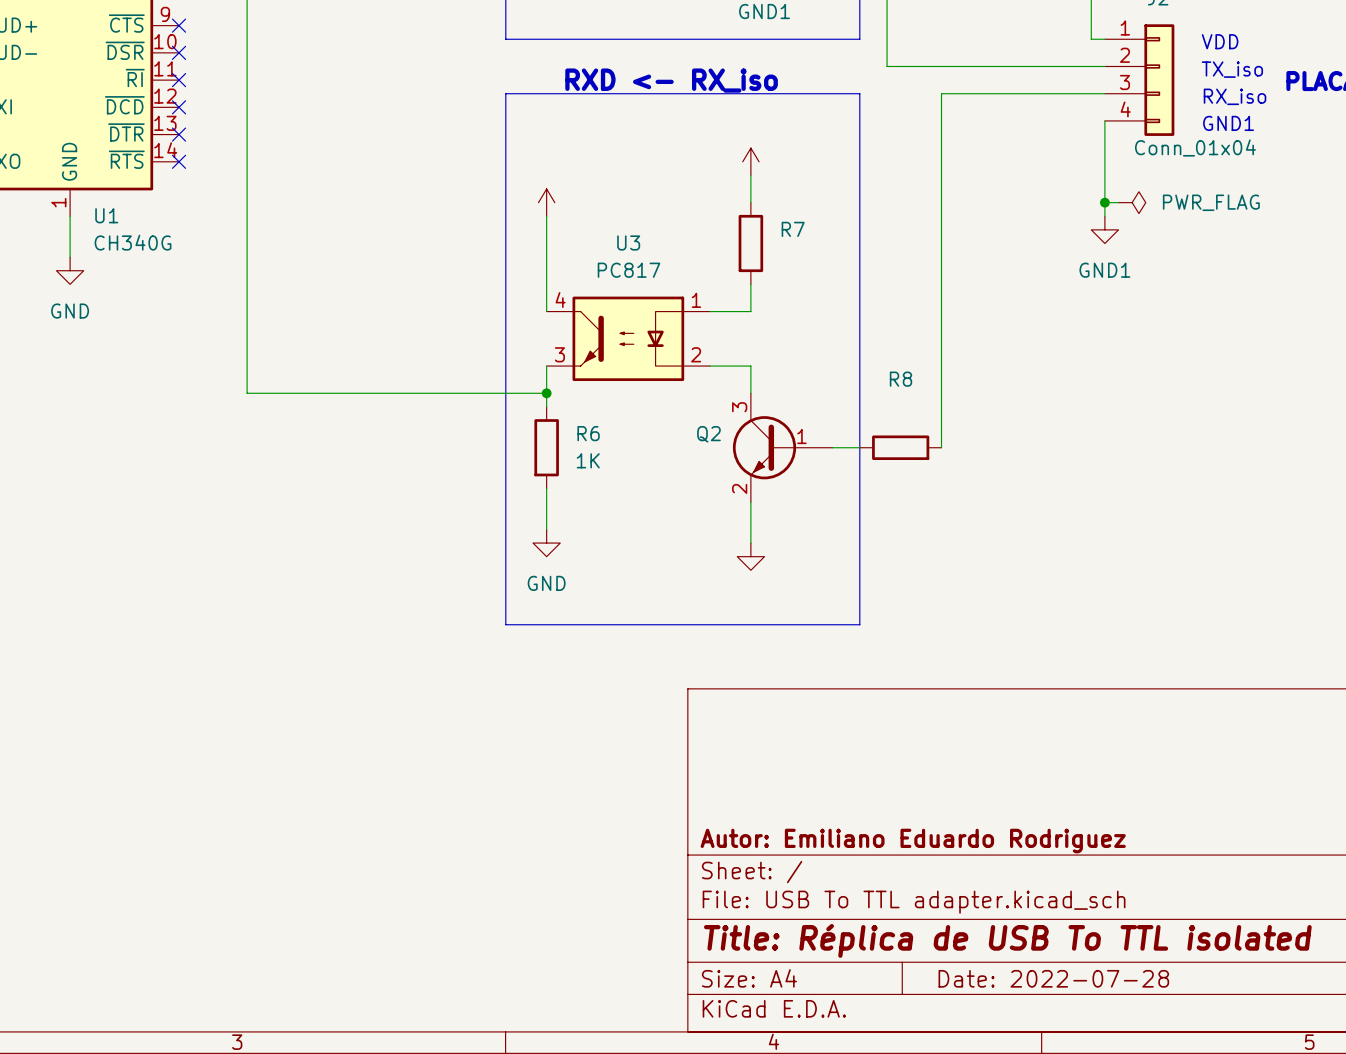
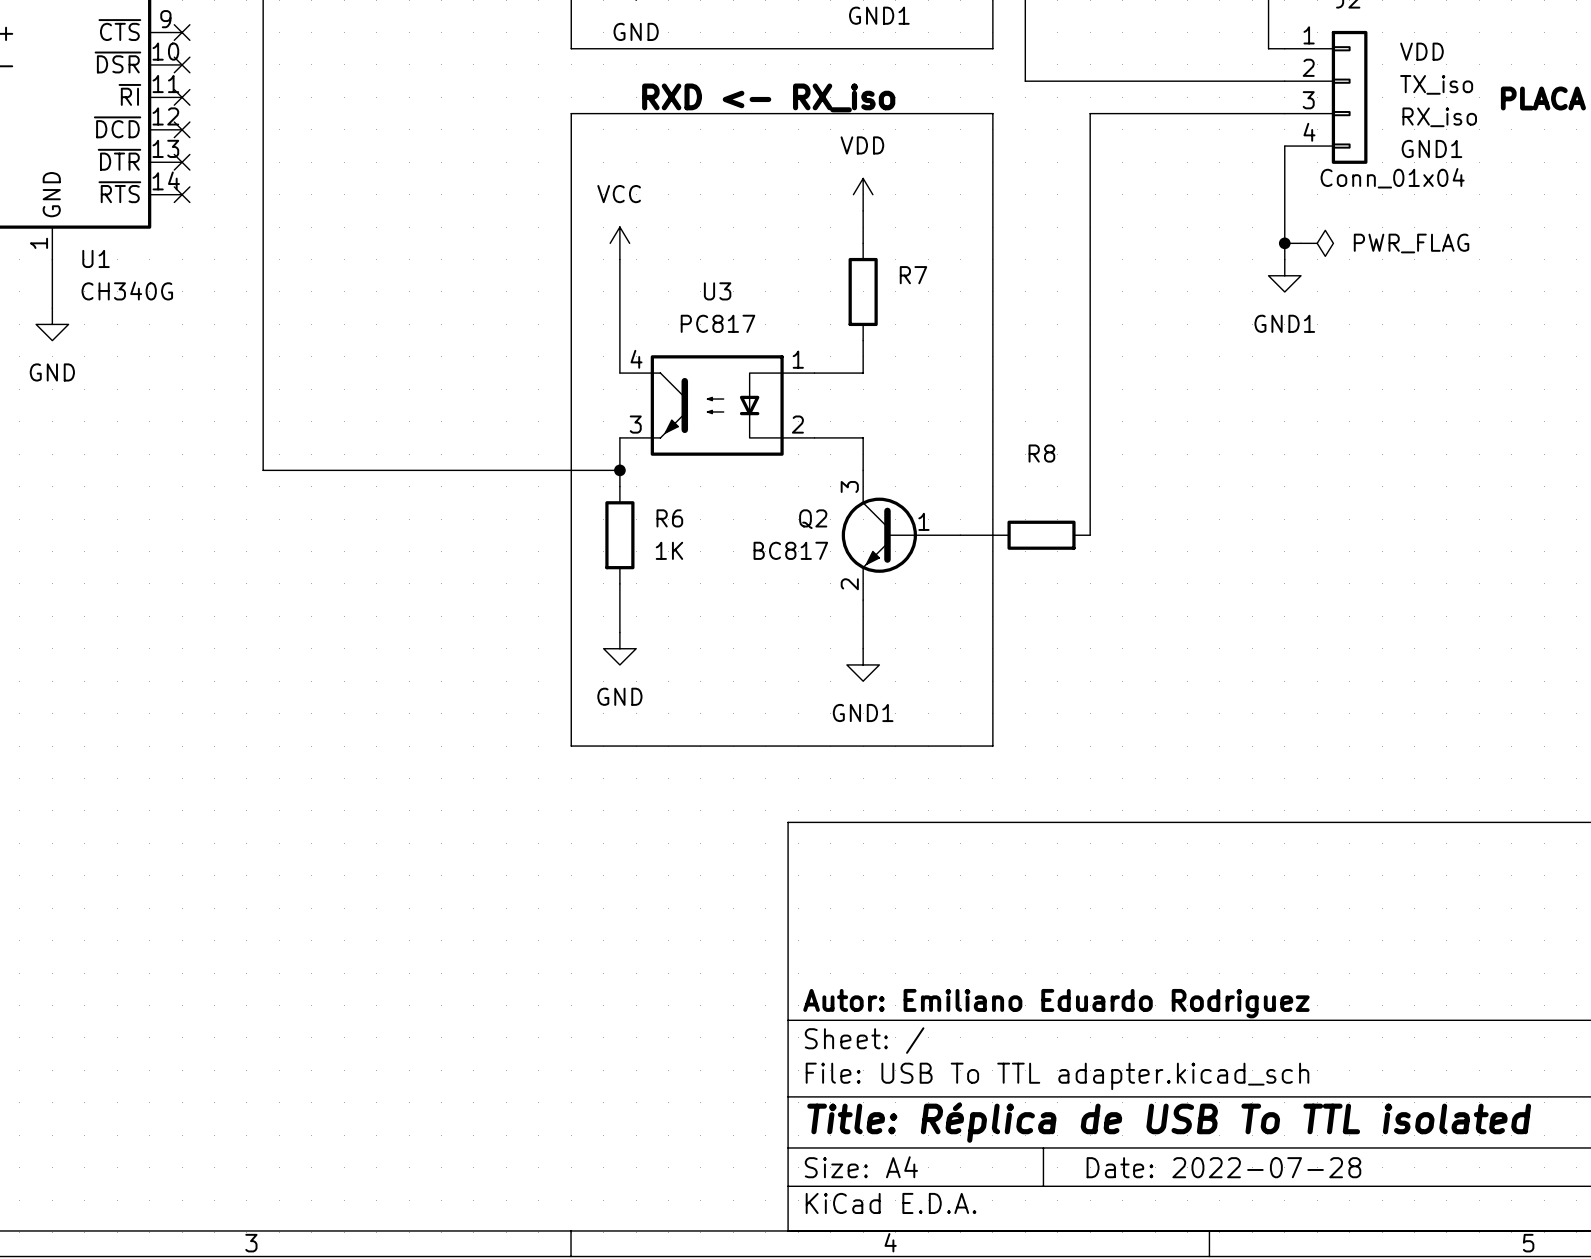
power symbol text: none -> GND (636, 31)
power symbol text: none -> VDD (862, 145)
power symbol text: none -> VCC (619, 194)
Q2 value: none -> BC817 (790, 550)
power symbol text: none -> GND1 (863, 713)

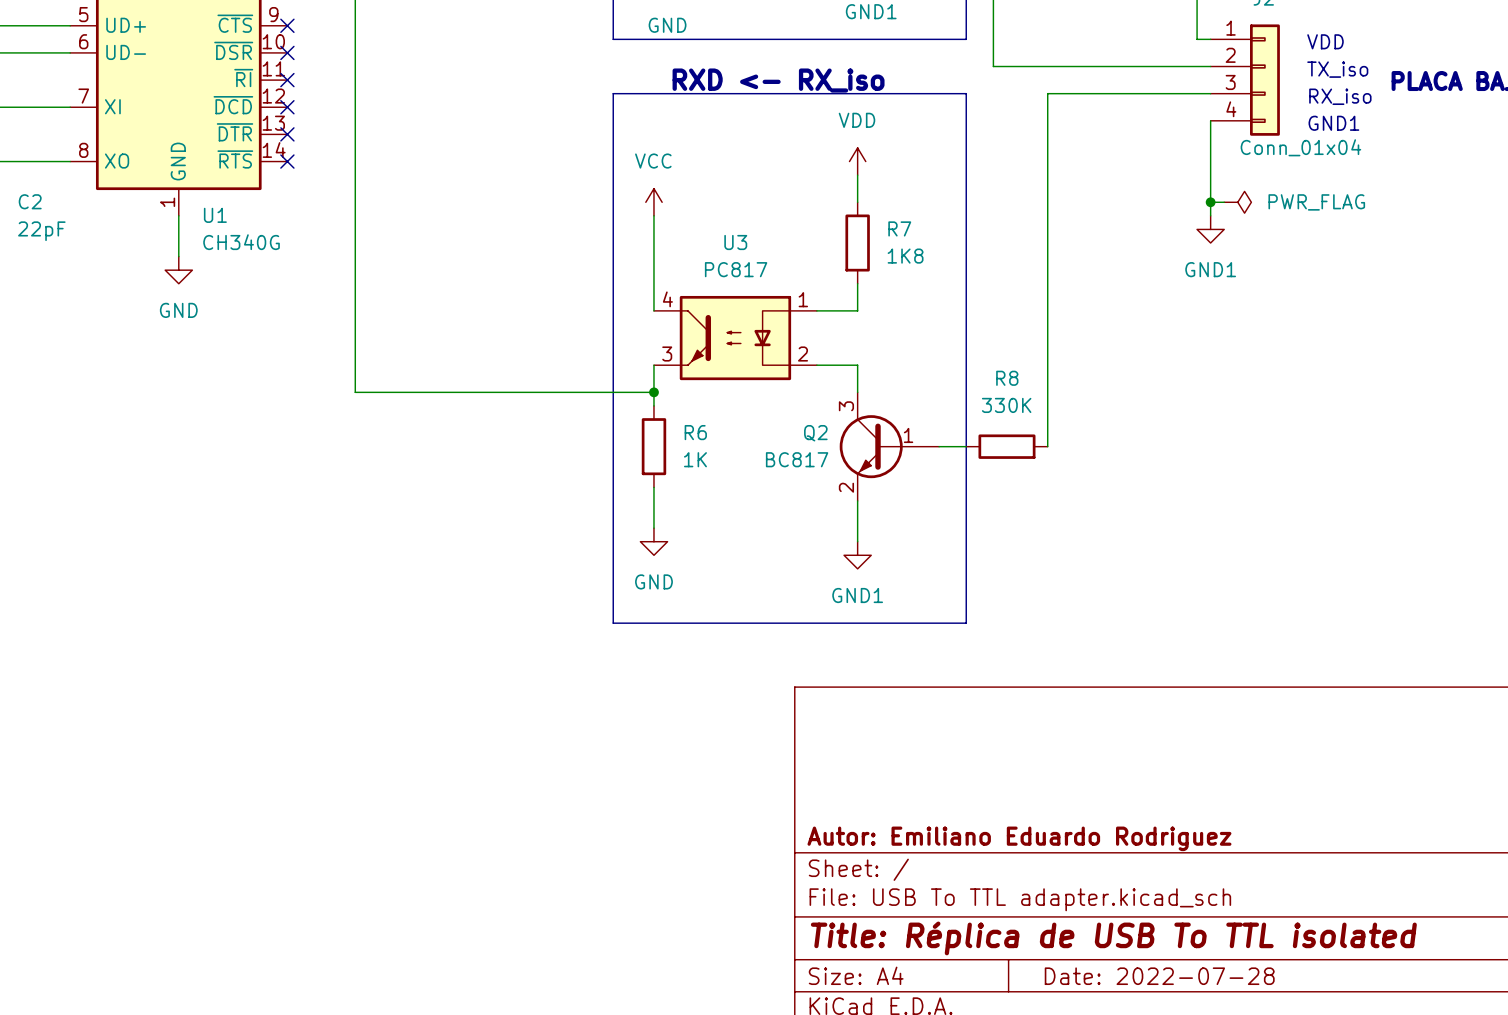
R7 value: none -> 1K8 (905, 256)
R8 value: none -> 330K (1006, 405)

